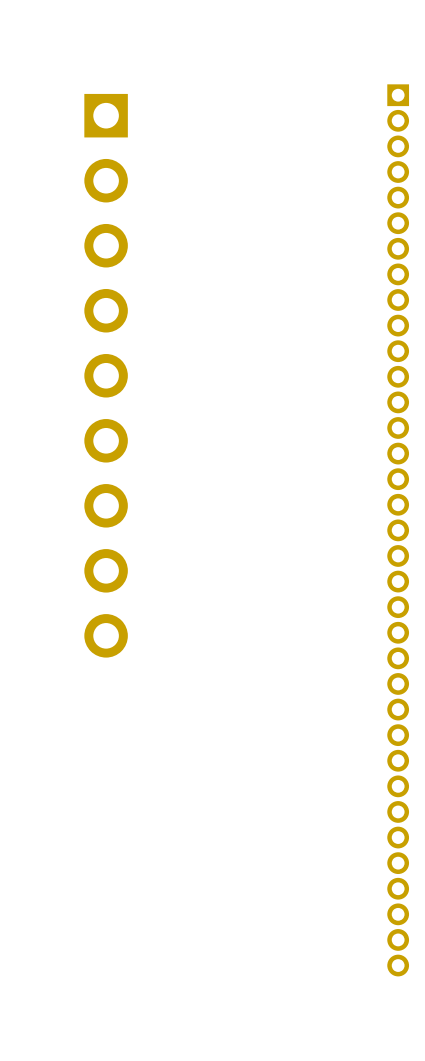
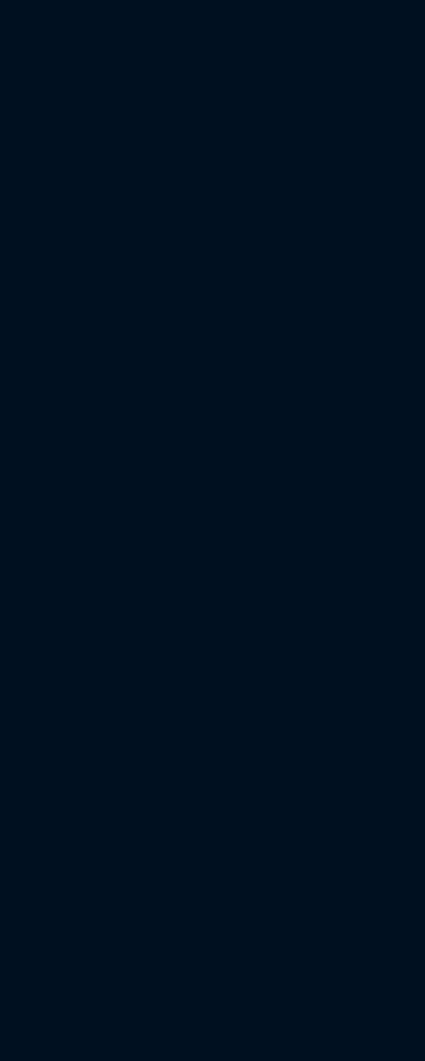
part: (106, 375) -> none
part: (398, 530) -> none

